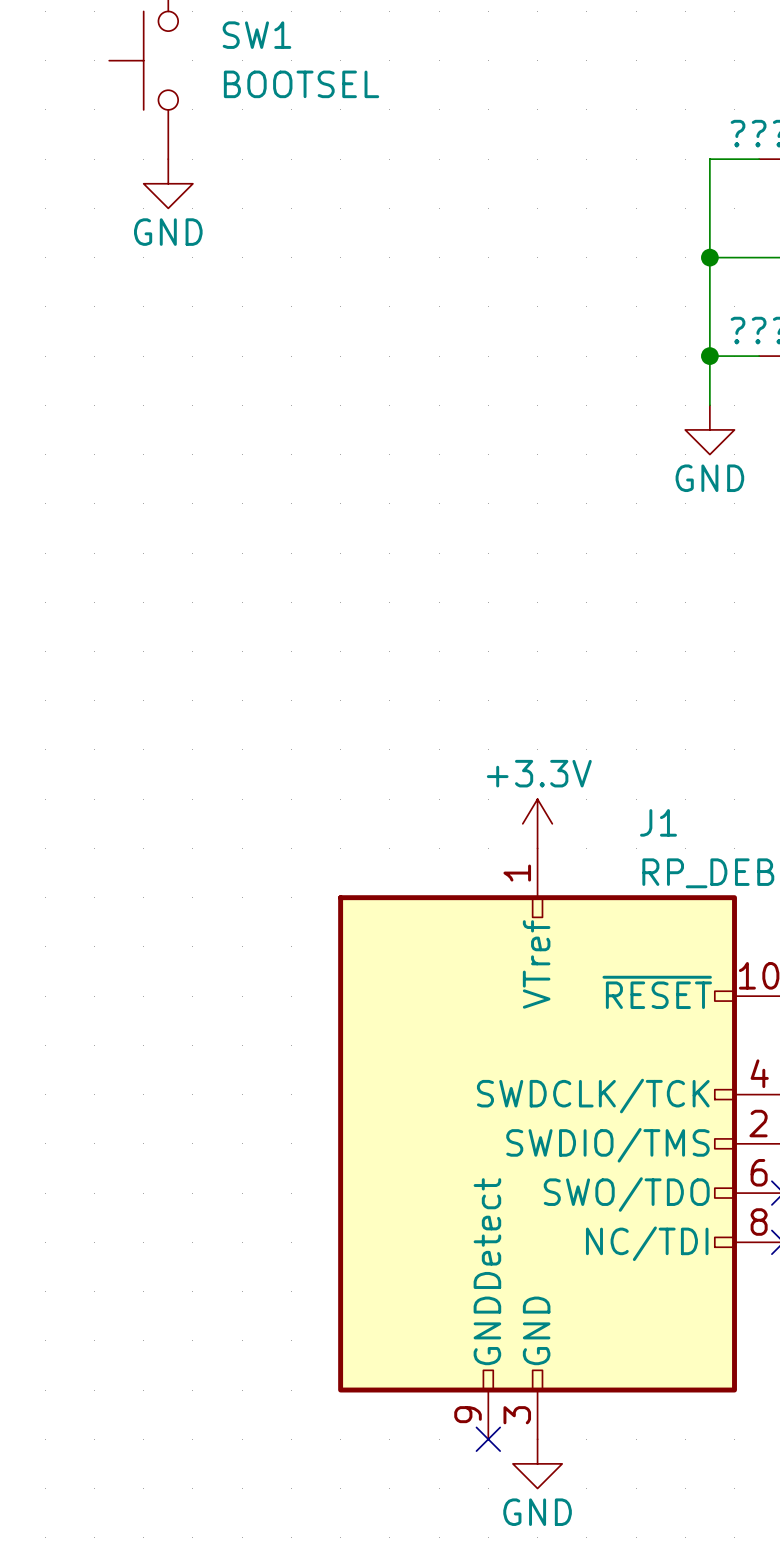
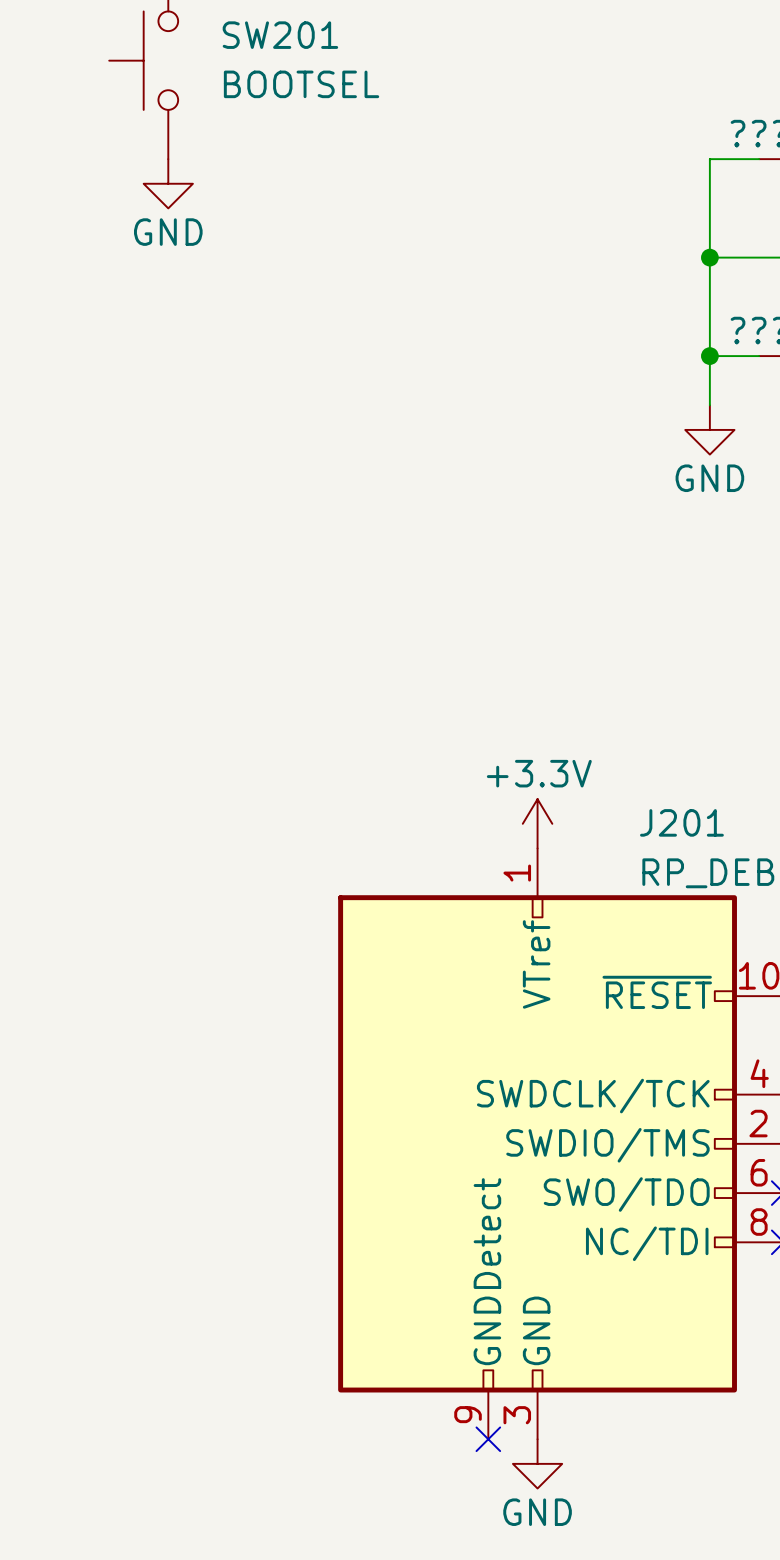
SW1 name: SW1 (256, 35) -> SW201 (280, 35)
J1 name: J1 (658, 822) -> J201 (681, 822)

